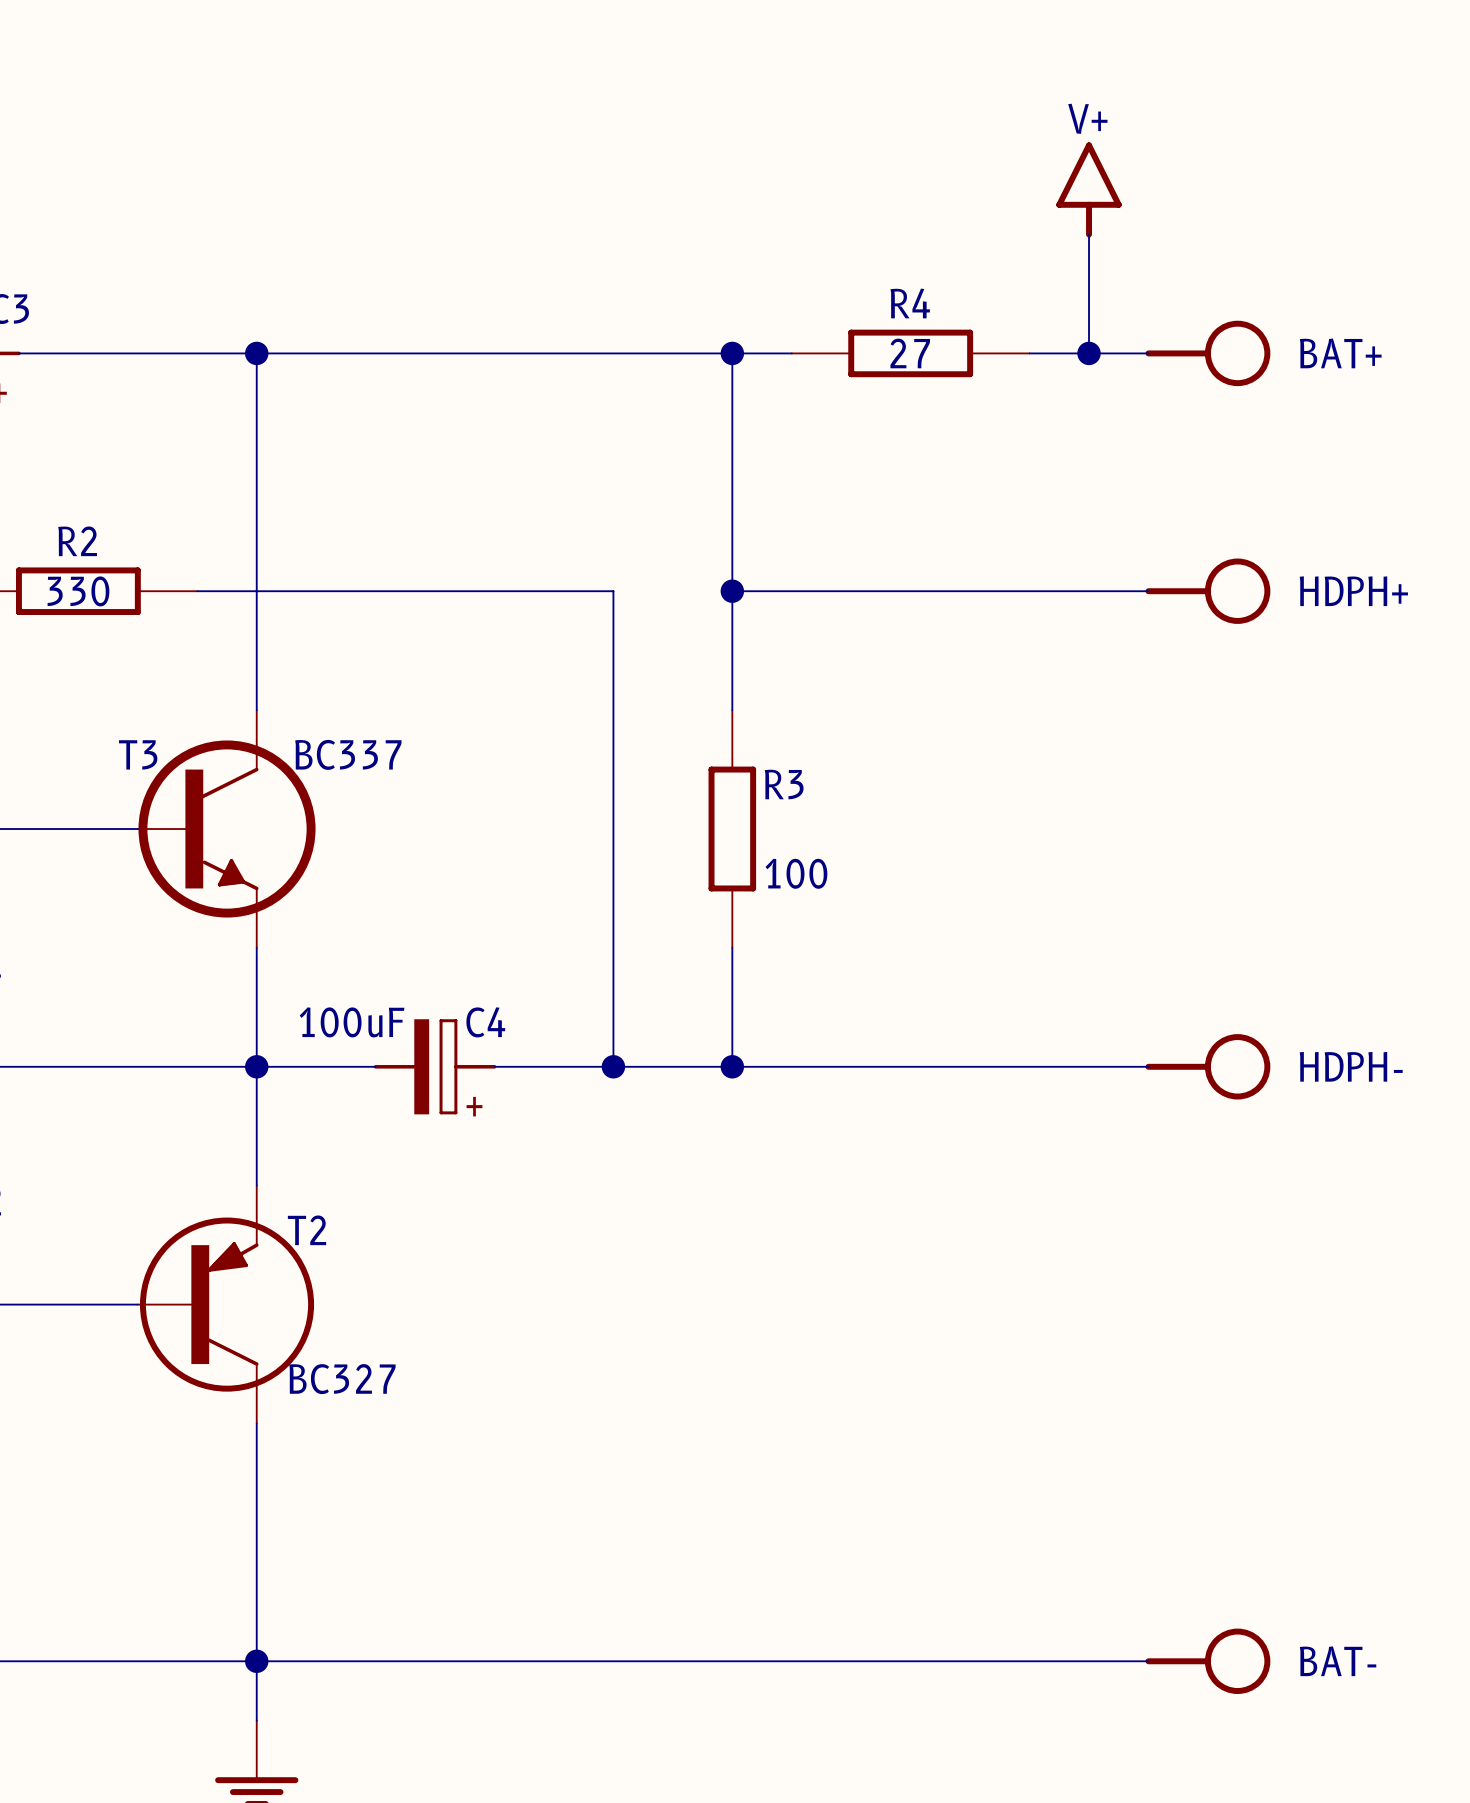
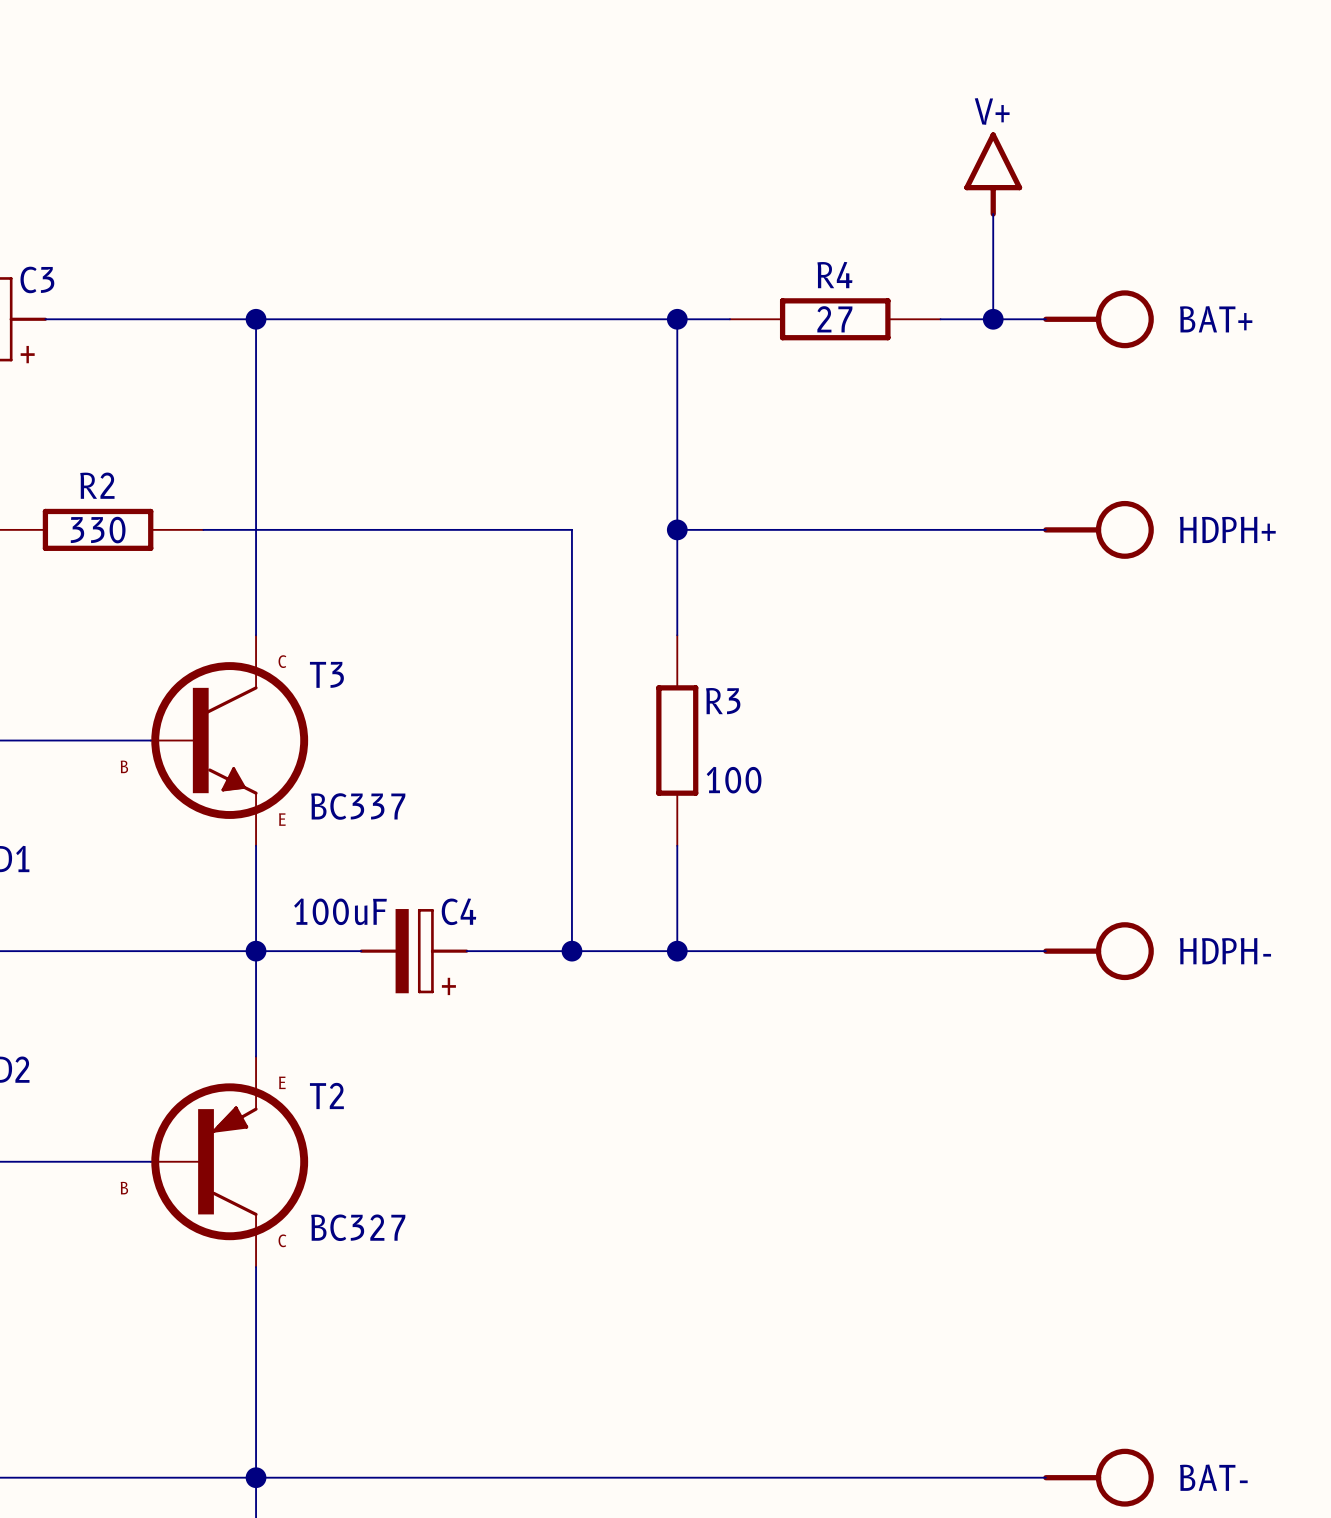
T3 text: none -> C (282, 661)
T3 name position: T3 (138, 754) -> T3 (326, 674)
T3 value position: BC337 (348, 754) -> BC337 (358, 806)
T3 text: none -> B (124, 766)
T3 text: none -> E (282, 819)
T2 symbol: [137, 1185, 315, 1424] -> [150, 1056, 309, 1268]

